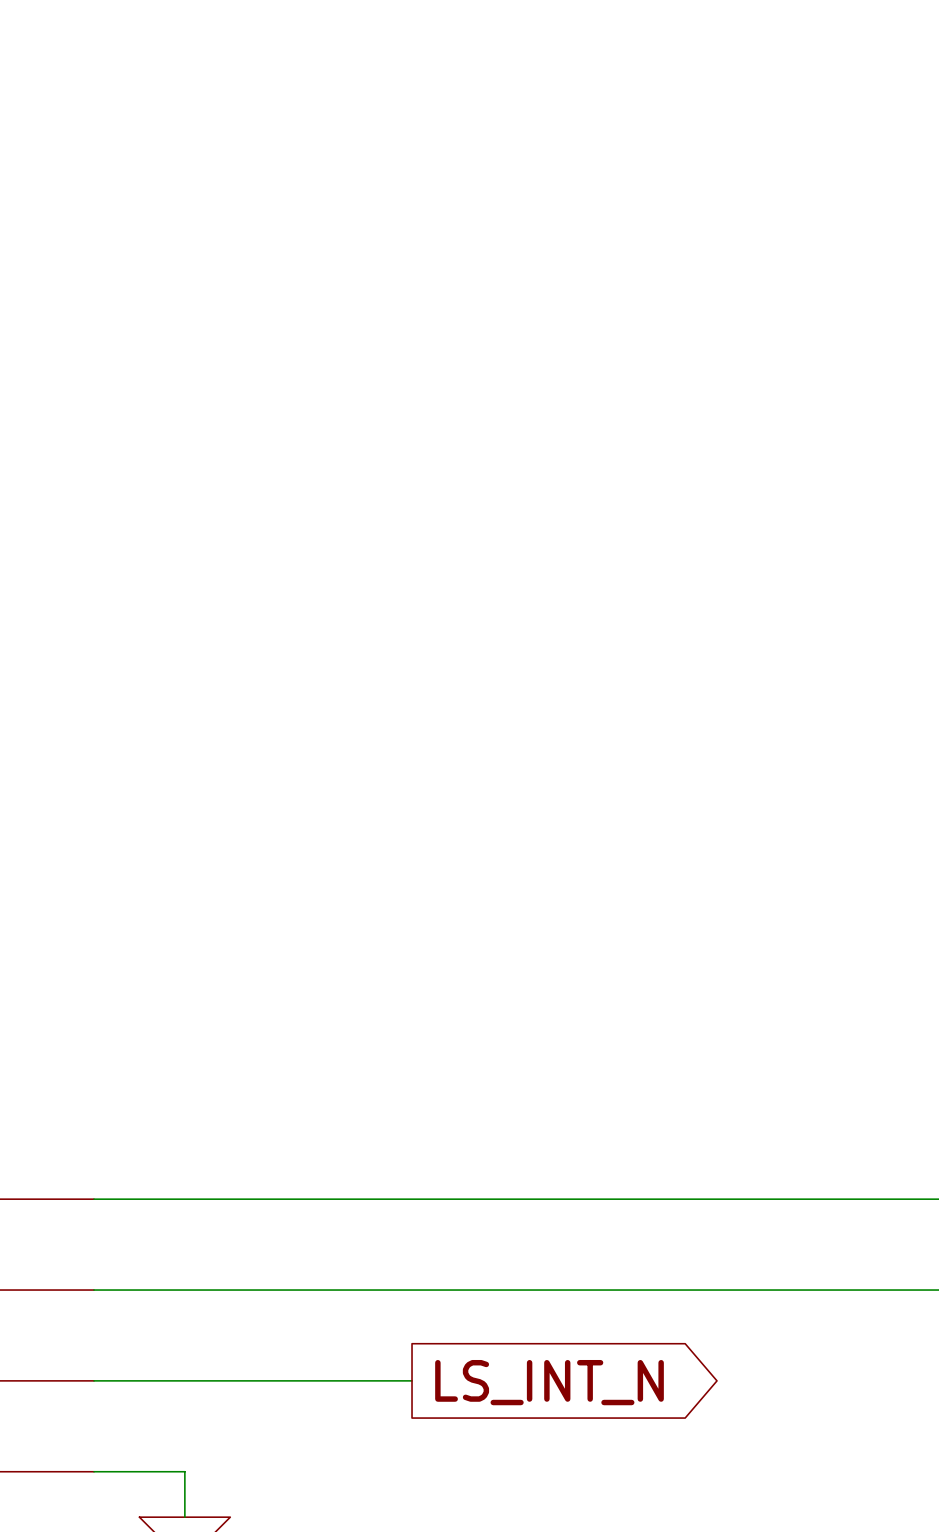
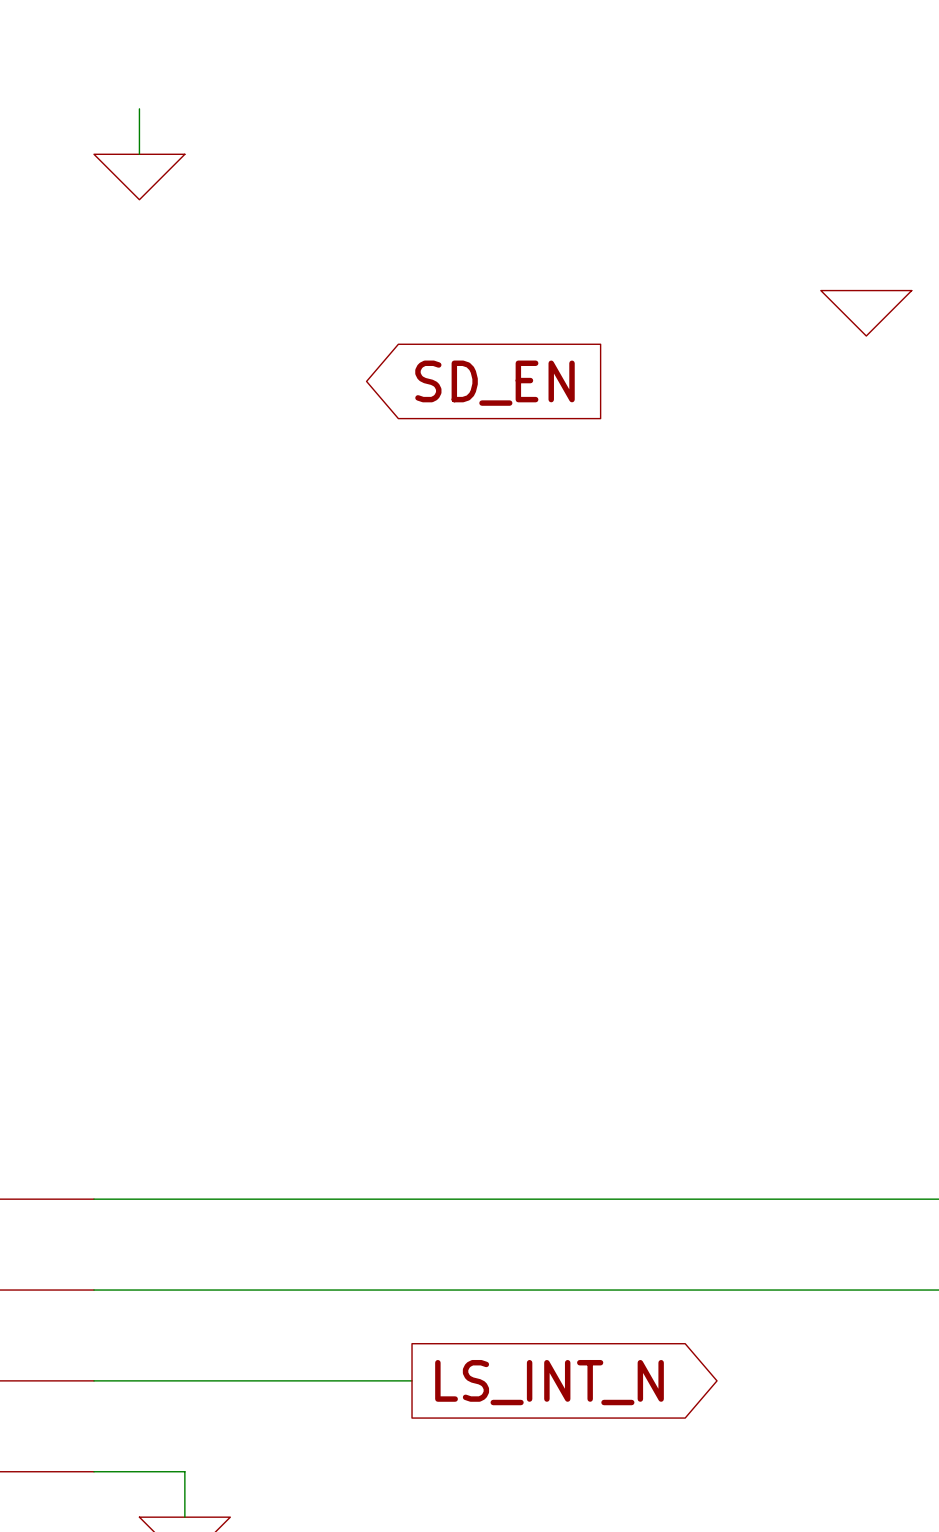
wire: none -> (139, 108) (139, 154)
power symbol: none -> (139, 177)
power symbol: none -> (866, 313)
global label: none -> SD_EN (494, 383)

